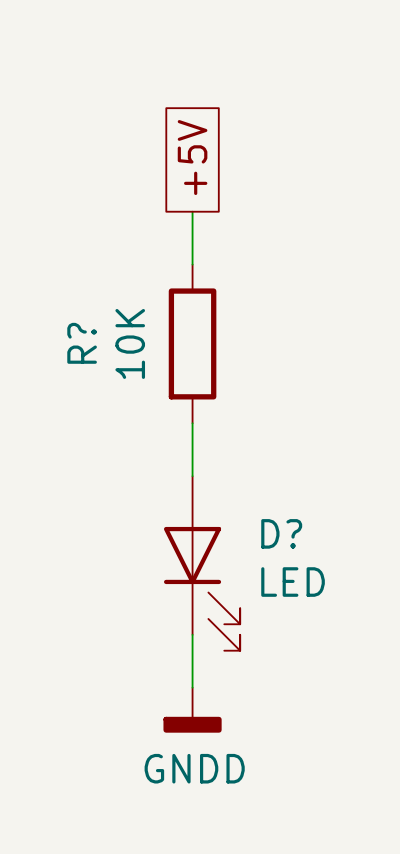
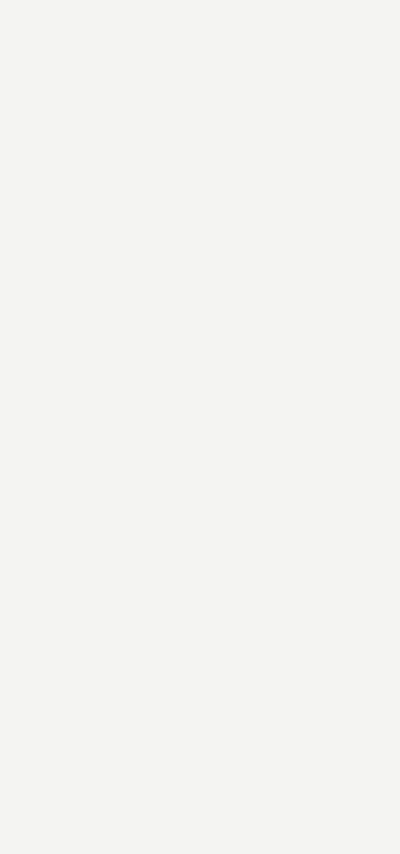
global label: +5V (192, 157) -> none
wire: (192, 211) (192, 264) -> none
R?: 10K (192, 343) -> none
wire: (192, 423) (192, 476) -> none
D?: LED (202, 563) -> none
wire: (192, 634) (192, 687) -> none
power symbol: GNDD (192, 710) -> none

